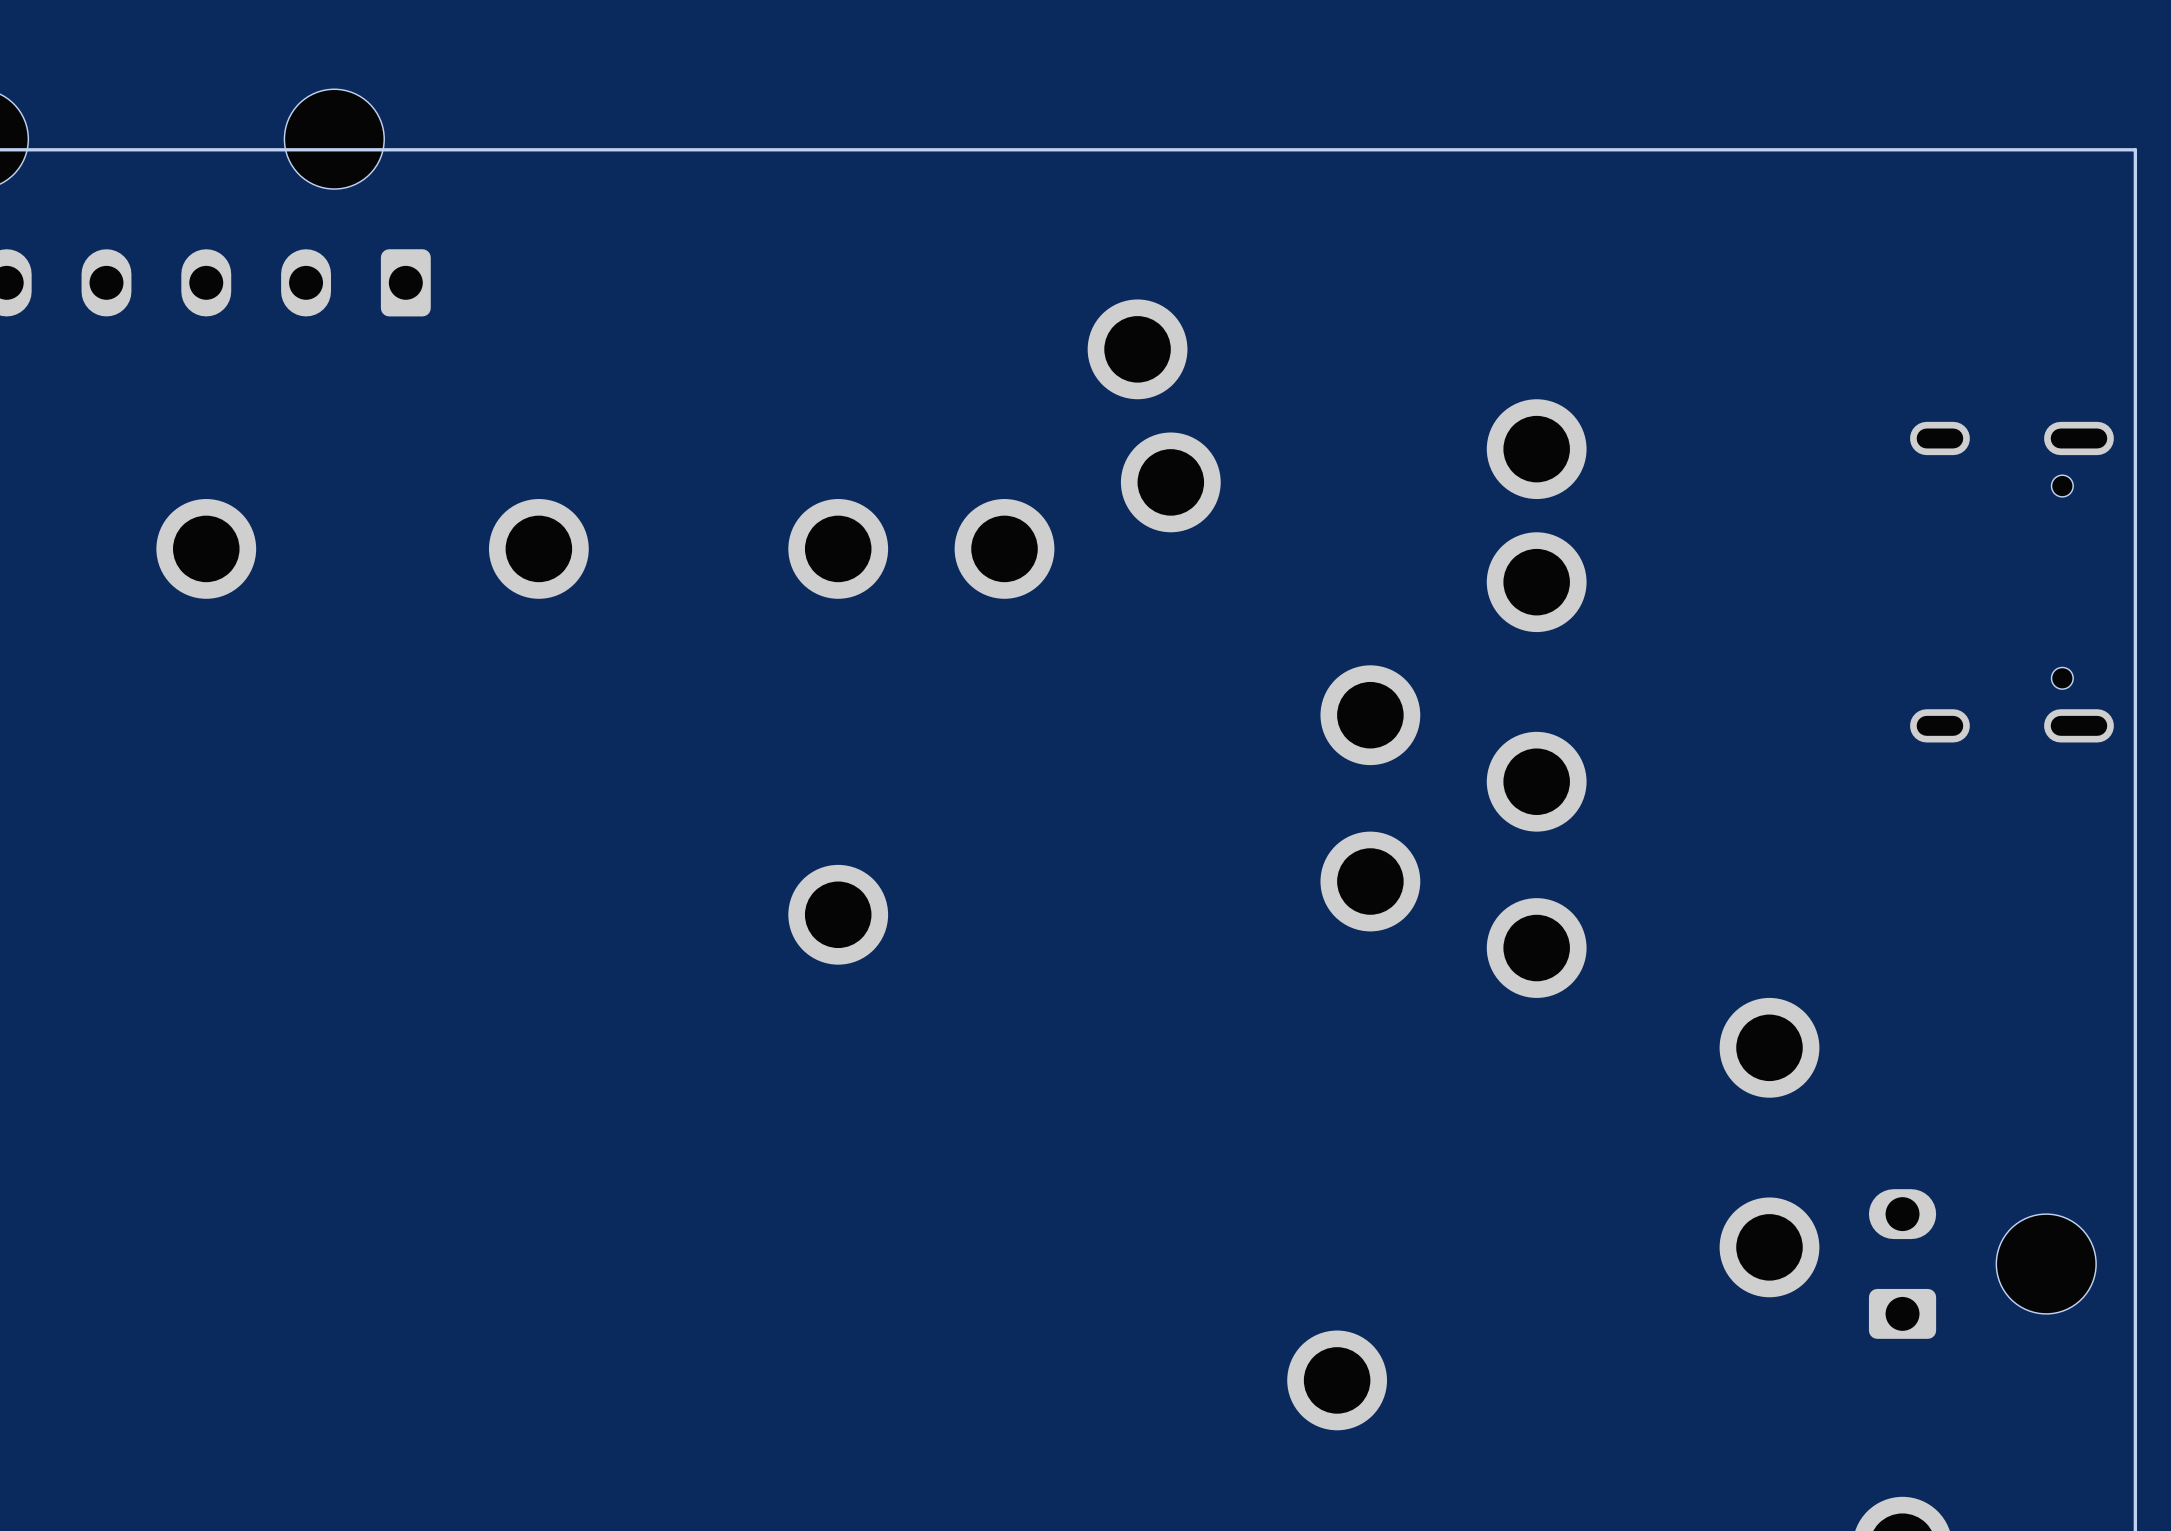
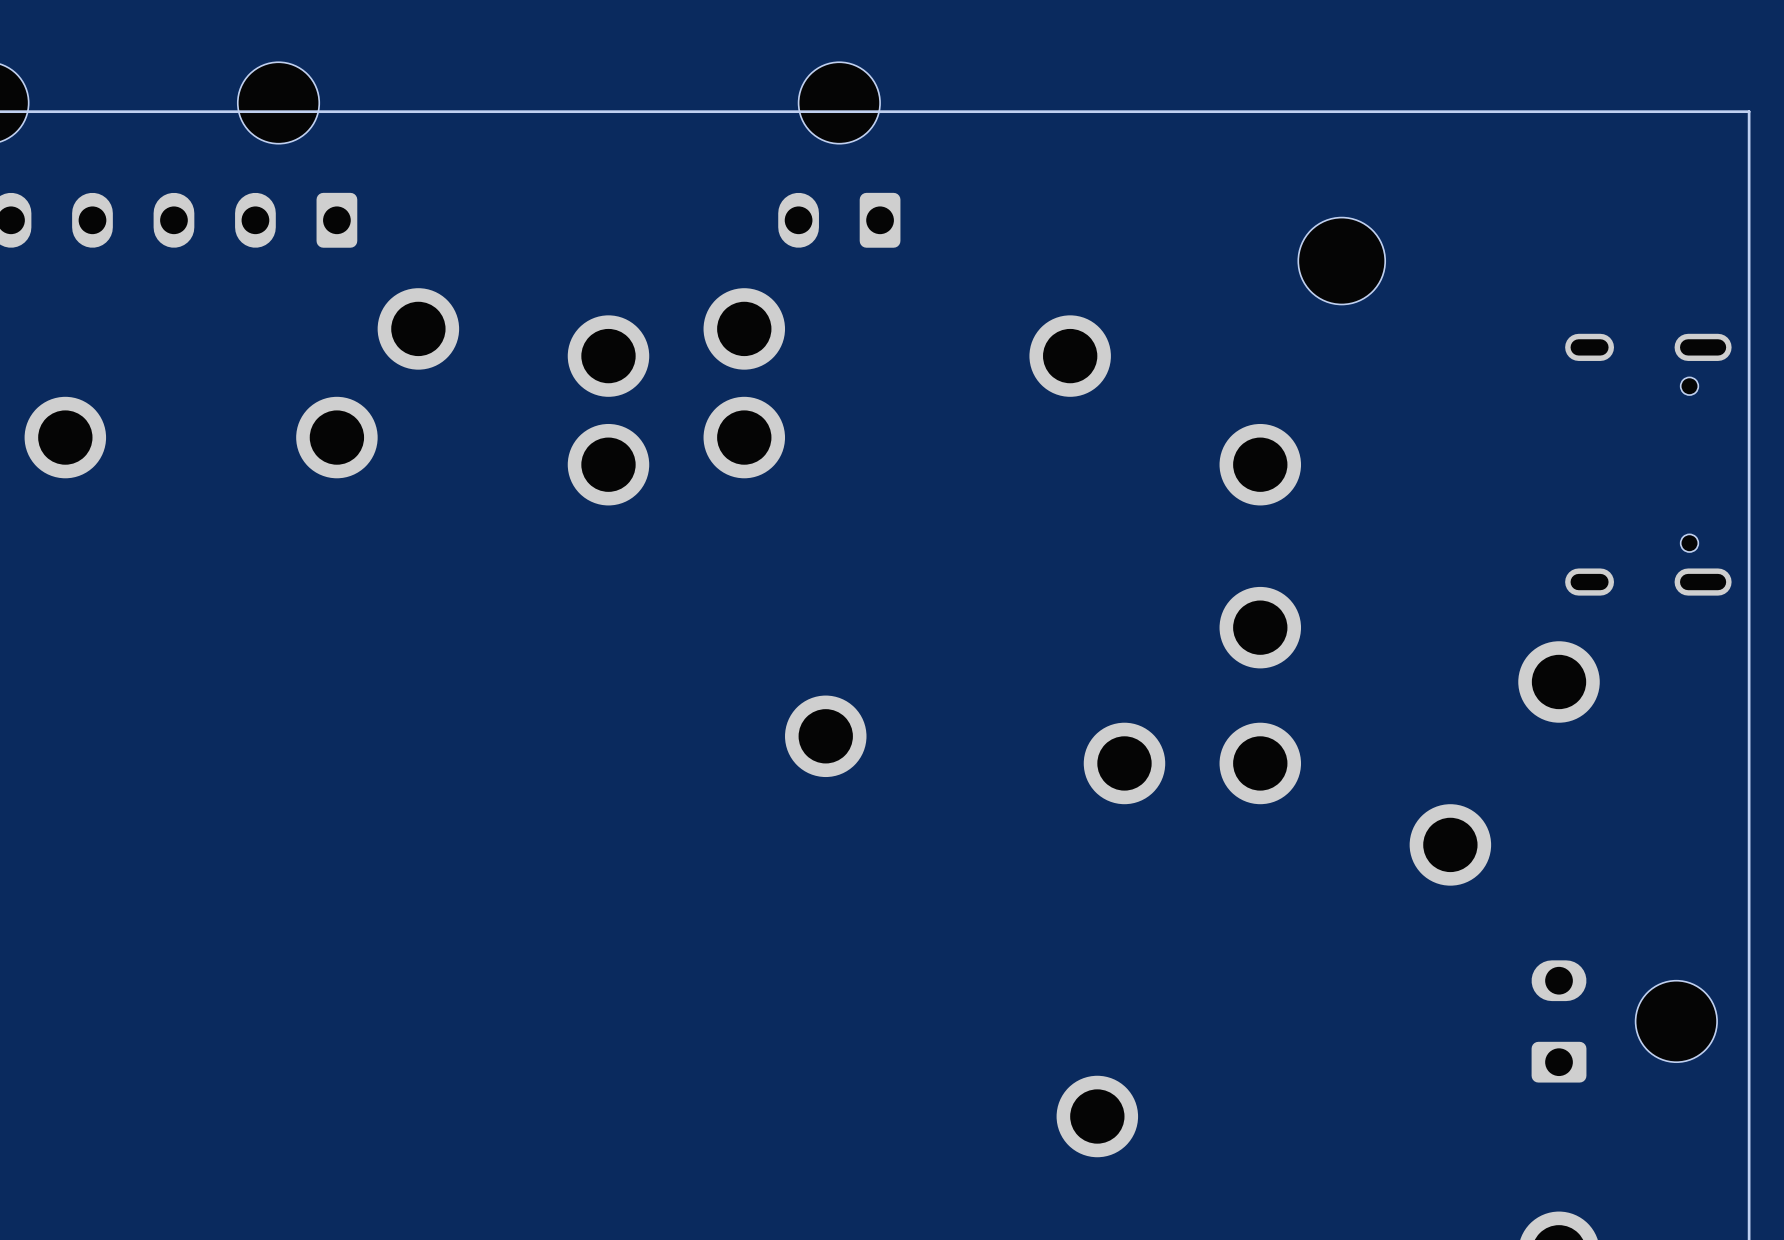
part: none -> (839, 154)
part: none -> (1341, 261)
part: (1137, 349) -> none
part: none -> (418, 328)
part: none -> (744, 328)
part: none -> (608, 356)
part: none -> (1070, 356)
part: (1536, 449) -> none
part: (1170, 482) -> none
part: none -> (65, 437)
part: (206, 548) -> none
part: none -> (336, 437)
part: (538, 548) -> none
part: (838, 548) -> none
part: none -> (744, 437)
part: (1004, 548) -> none
part: none -> (608, 464)
part: (1370, 715) -> none
part: none -> (1559, 681)
part position: (1370, 881) -> (1124, 763)
part position: (838, 914) -> (825, 736)
part: (1769, 1247) -> none

